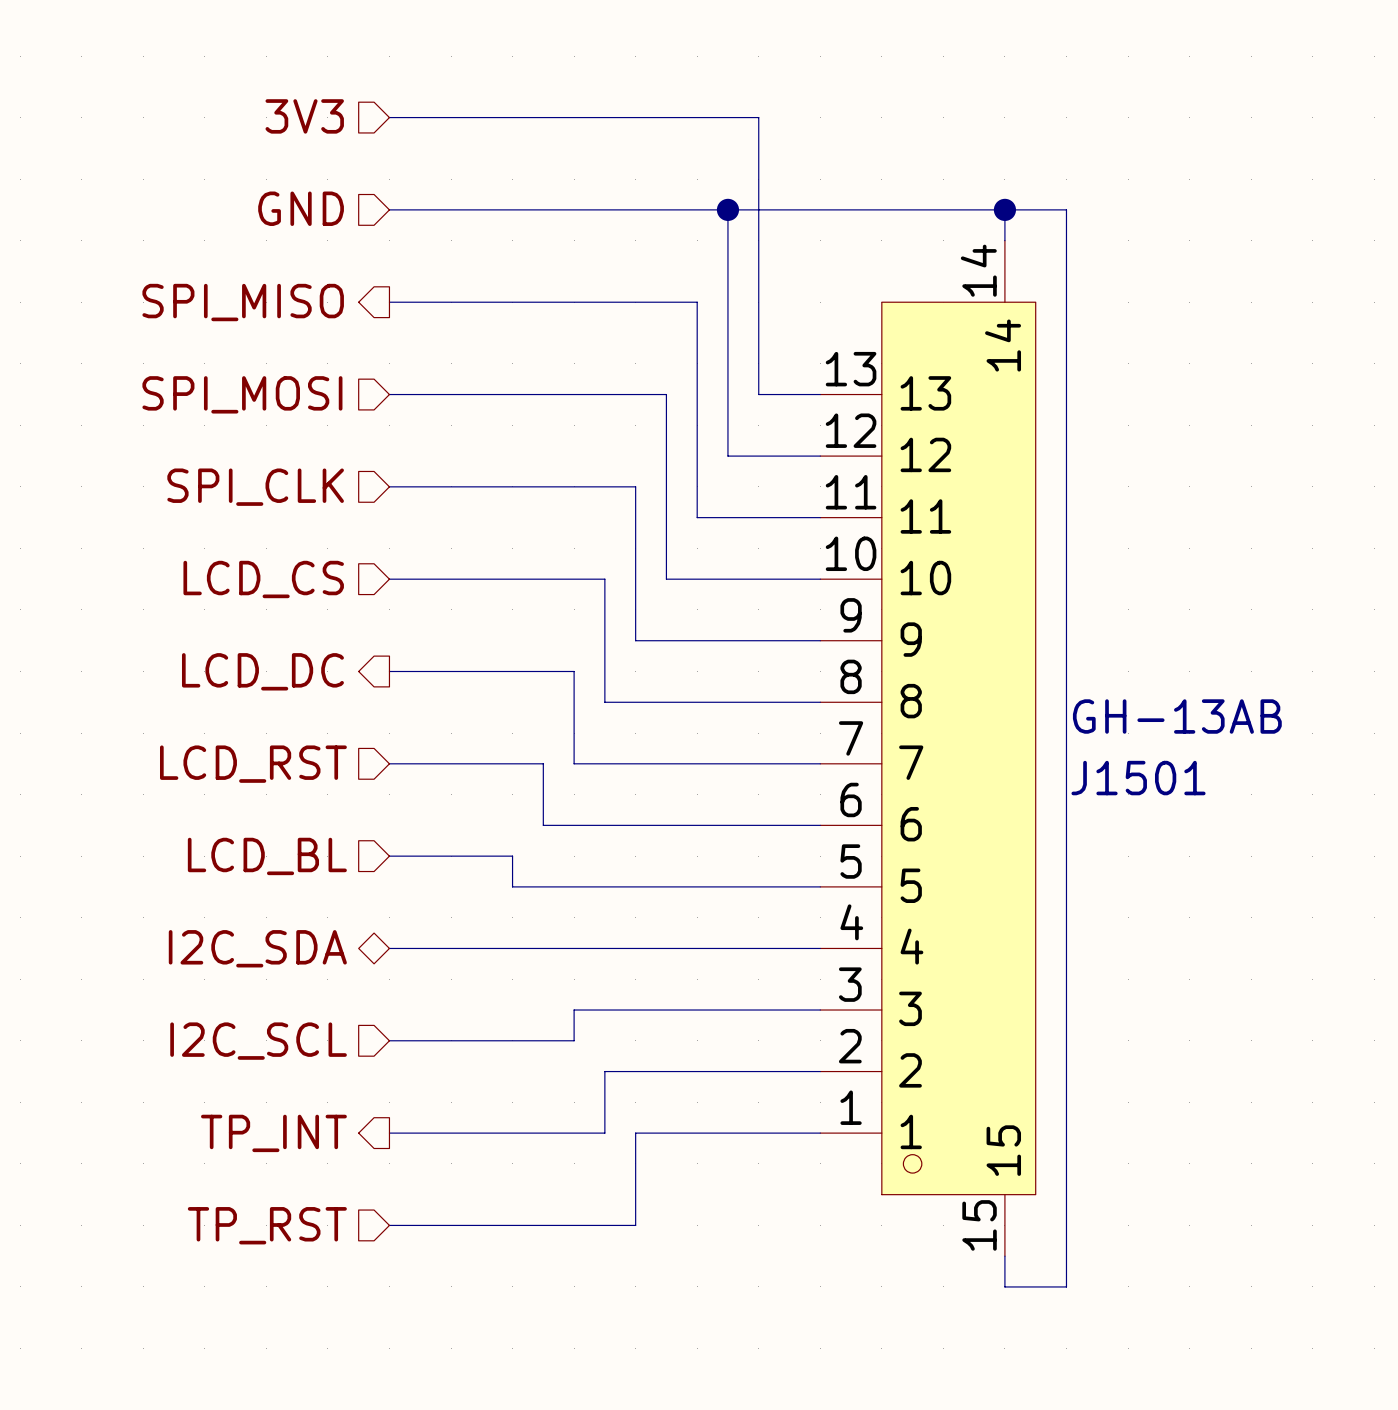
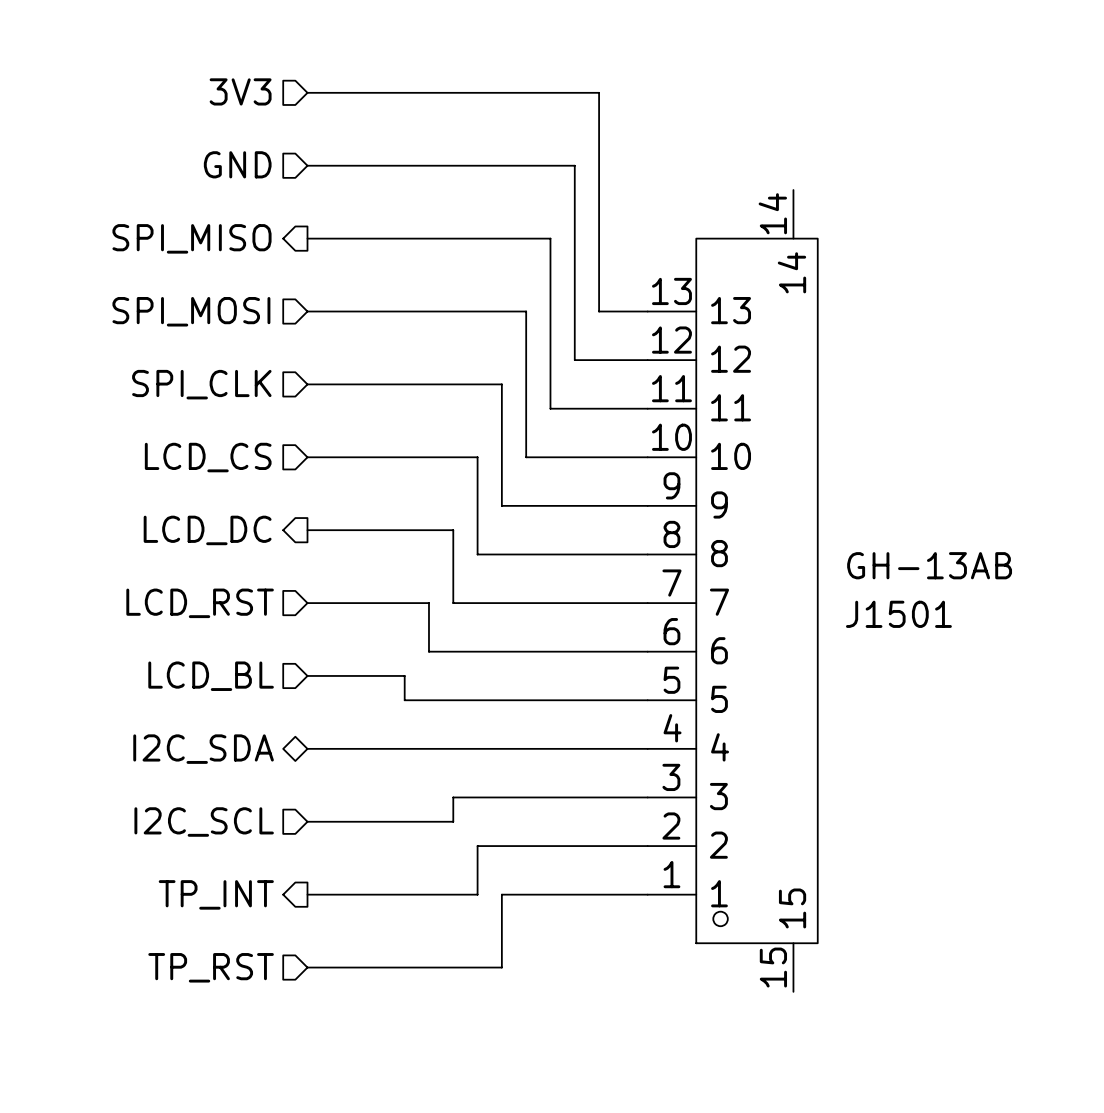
wire: (727, 209) (1066, 209) (1066, 1286) (1004, 1286) (1004, 1256) -> none
junction: (727, 209) -> none
wire: (1004, 209) (1004, 240) -> none
junction: (1004, 209) -> none

